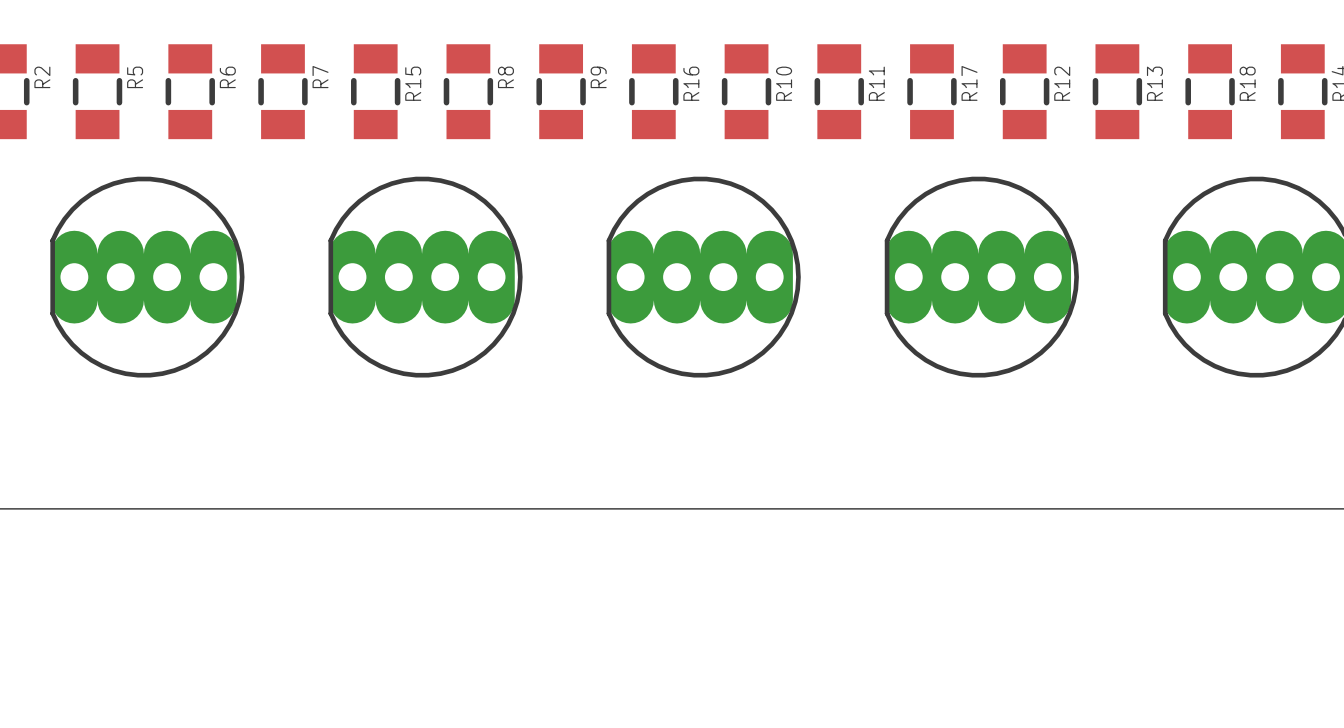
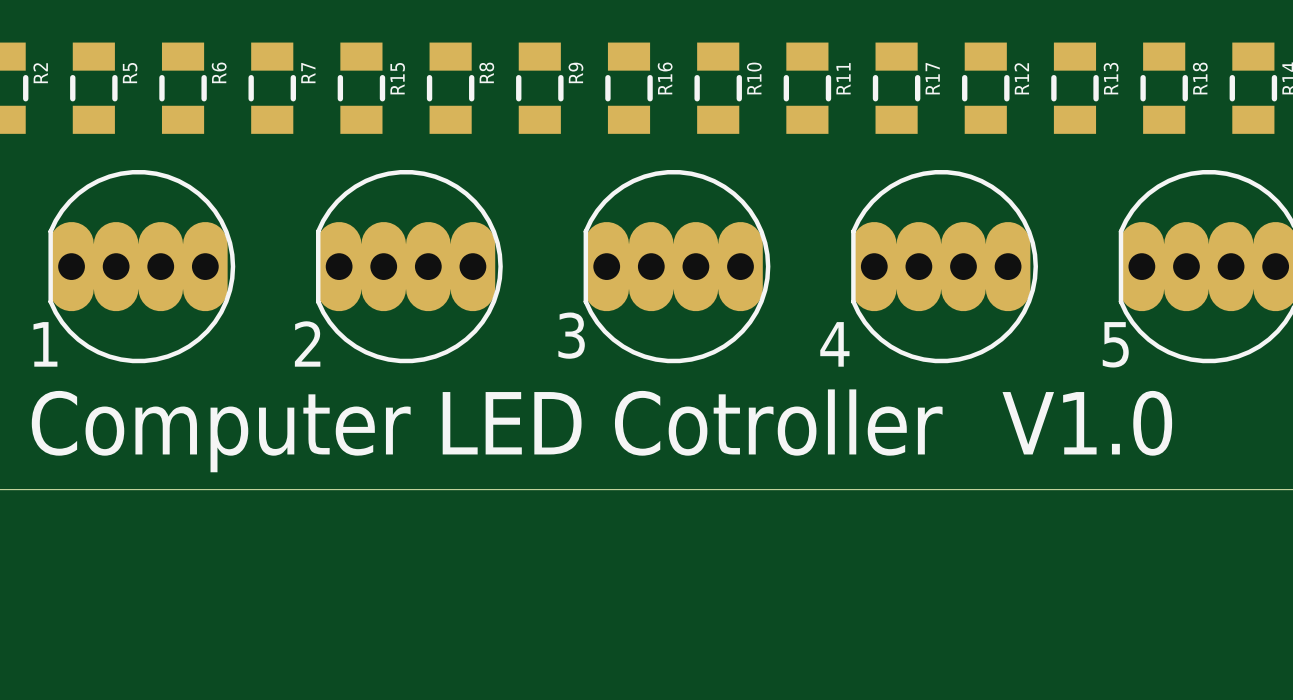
text: none -> 3 (571, 335)
text: none -> 4 (834, 344)
text: none -> 1 (45, 344)
text: none -> 2 (307, 343)
text: none -> 5 (1115, 344)
text: none -> V1.0 (1087, 423)
text: none -> Computer LED Cotroller (487, 430)

